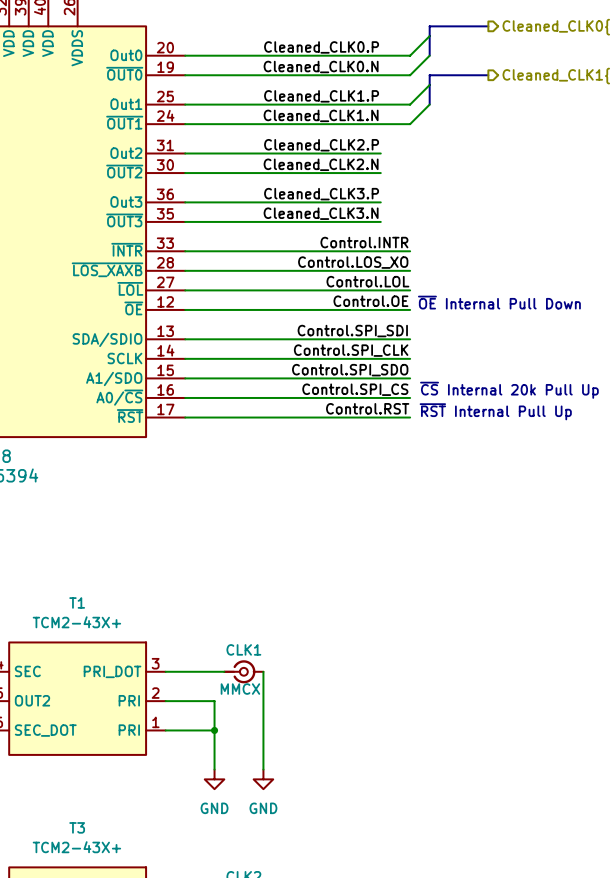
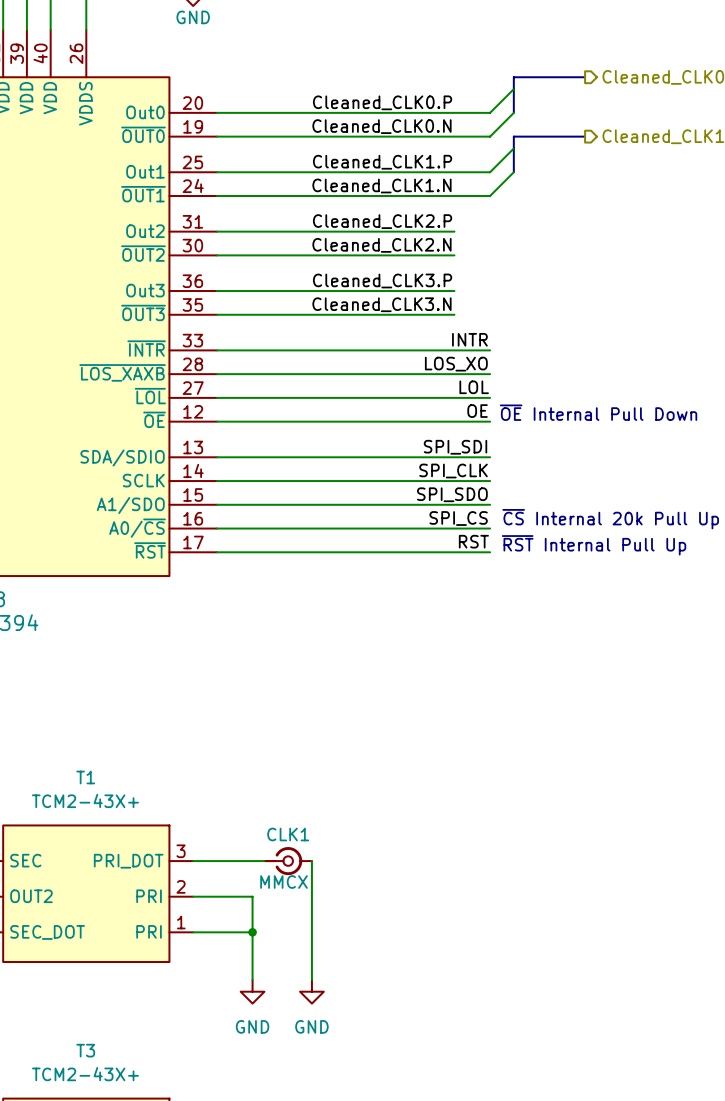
label: Control.INTR (364, 242) -> INTR (469, 339)
label: Control.LOS_XO (353, 262) -> LOS_XO (456, 364)
label: Control.LOL (367, 281) -> LOL (474, 387)
label: Control.OE (370, 301) -> OE (477, 411)
label: Control.SPI_SDI (352, 331) -> SPI_SDI (455, 447)
label: Control.SPI_CLK (351, 350) -> SPI_CLK (453, 471)
label: Control.SPI_SDO (350, 370) -> SPI_SDO (452, 494)
label: Control.SPI_CS (355, 389) -> SPI_CS (458, 518)
label: Control.RST (367, 408) -> RST (473, 541)

